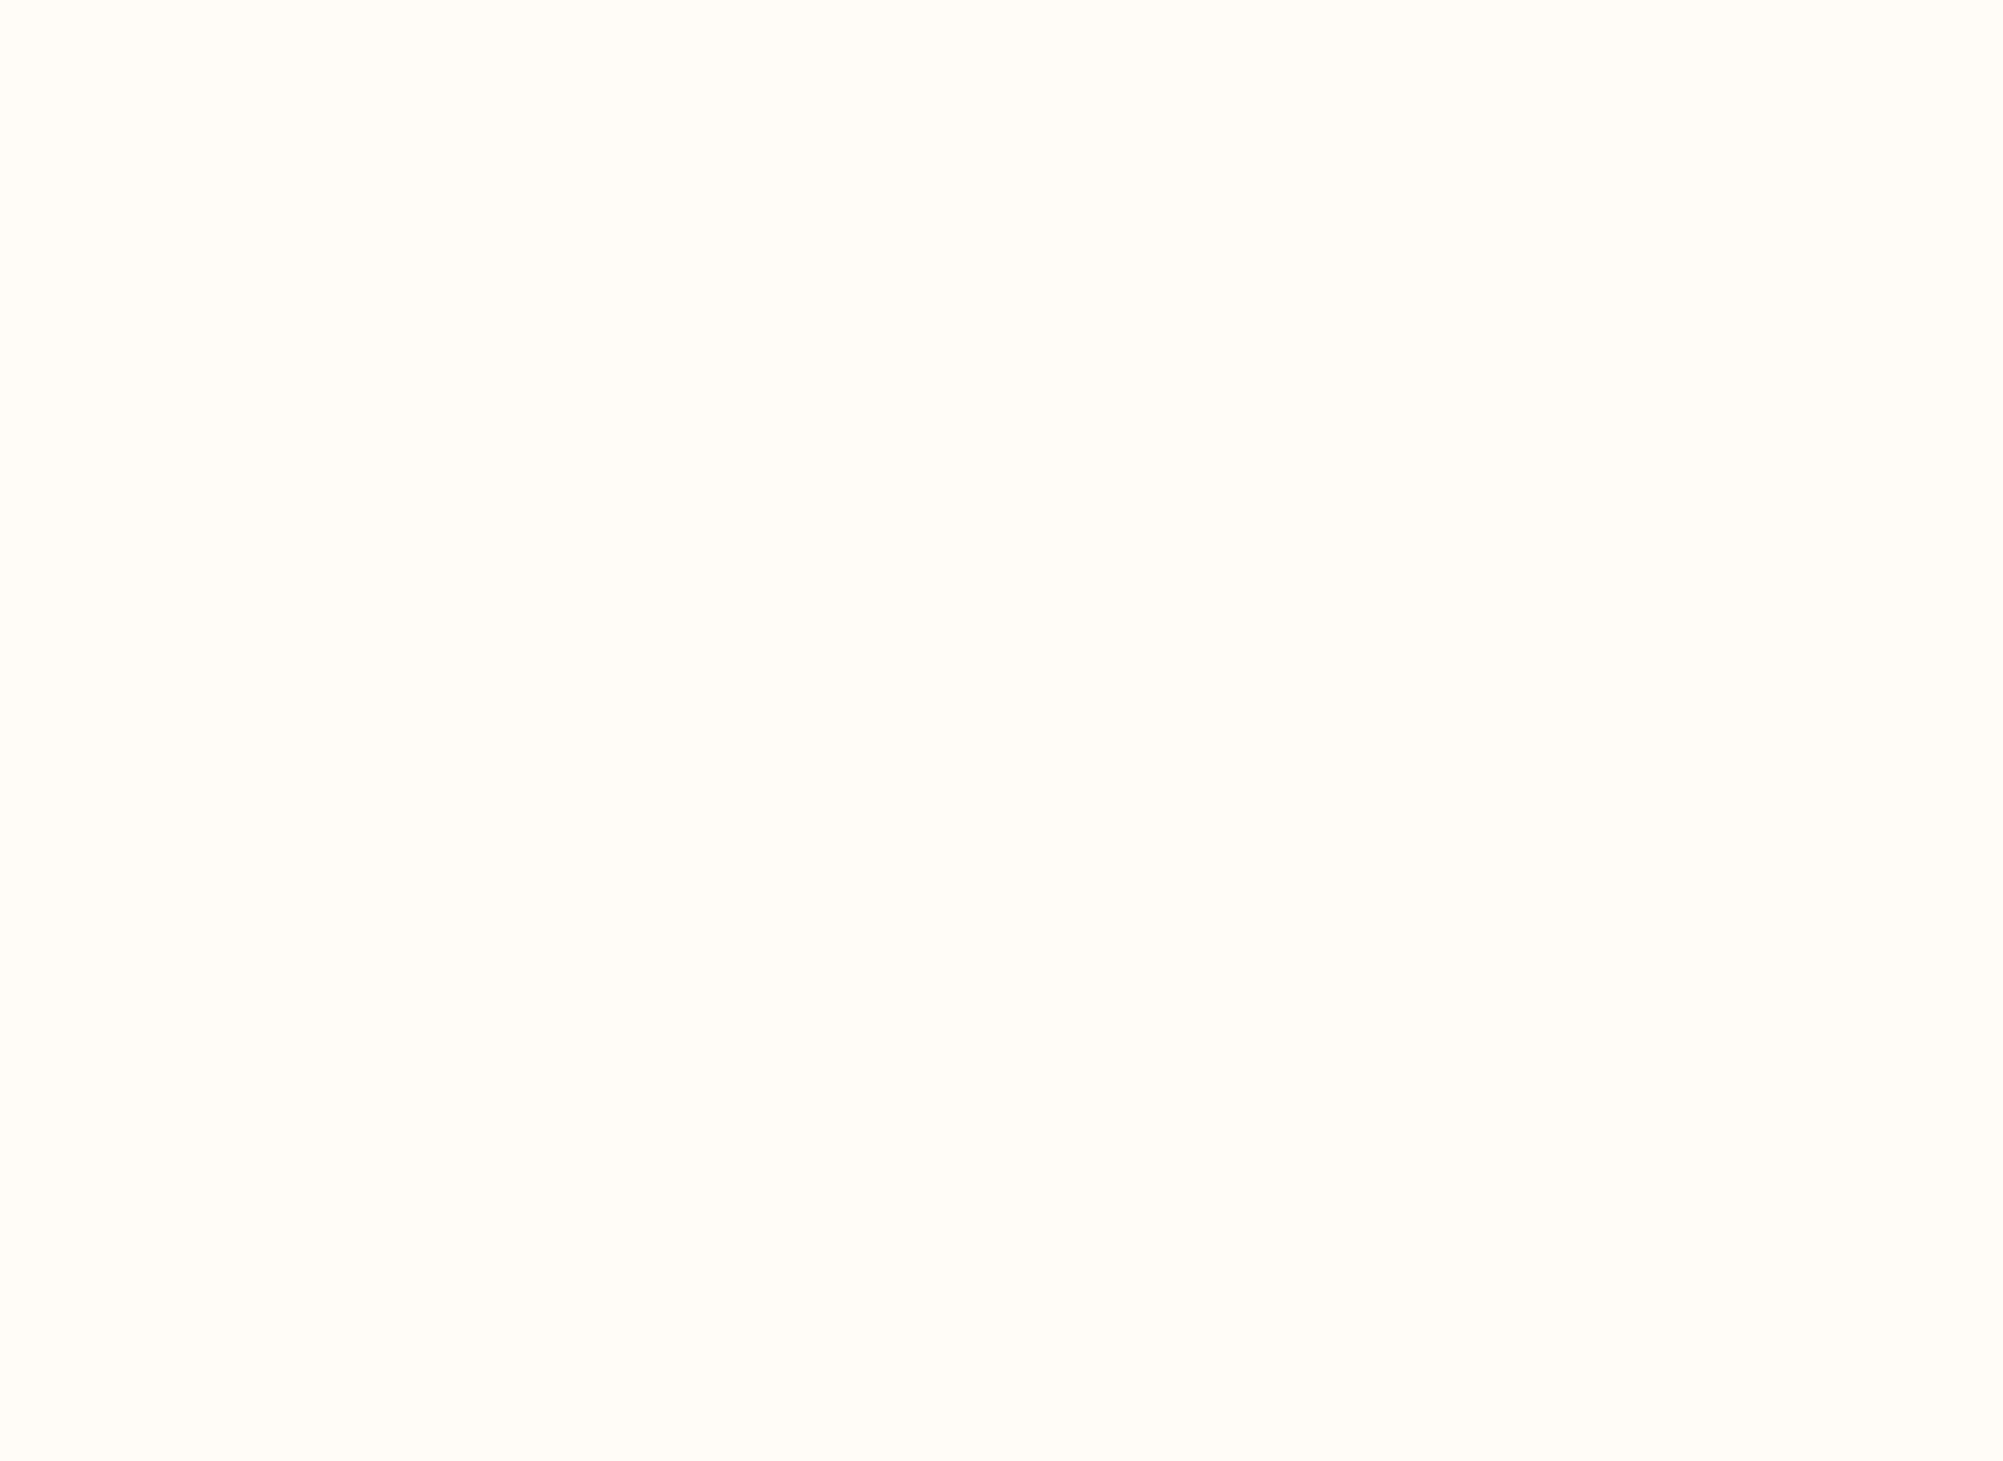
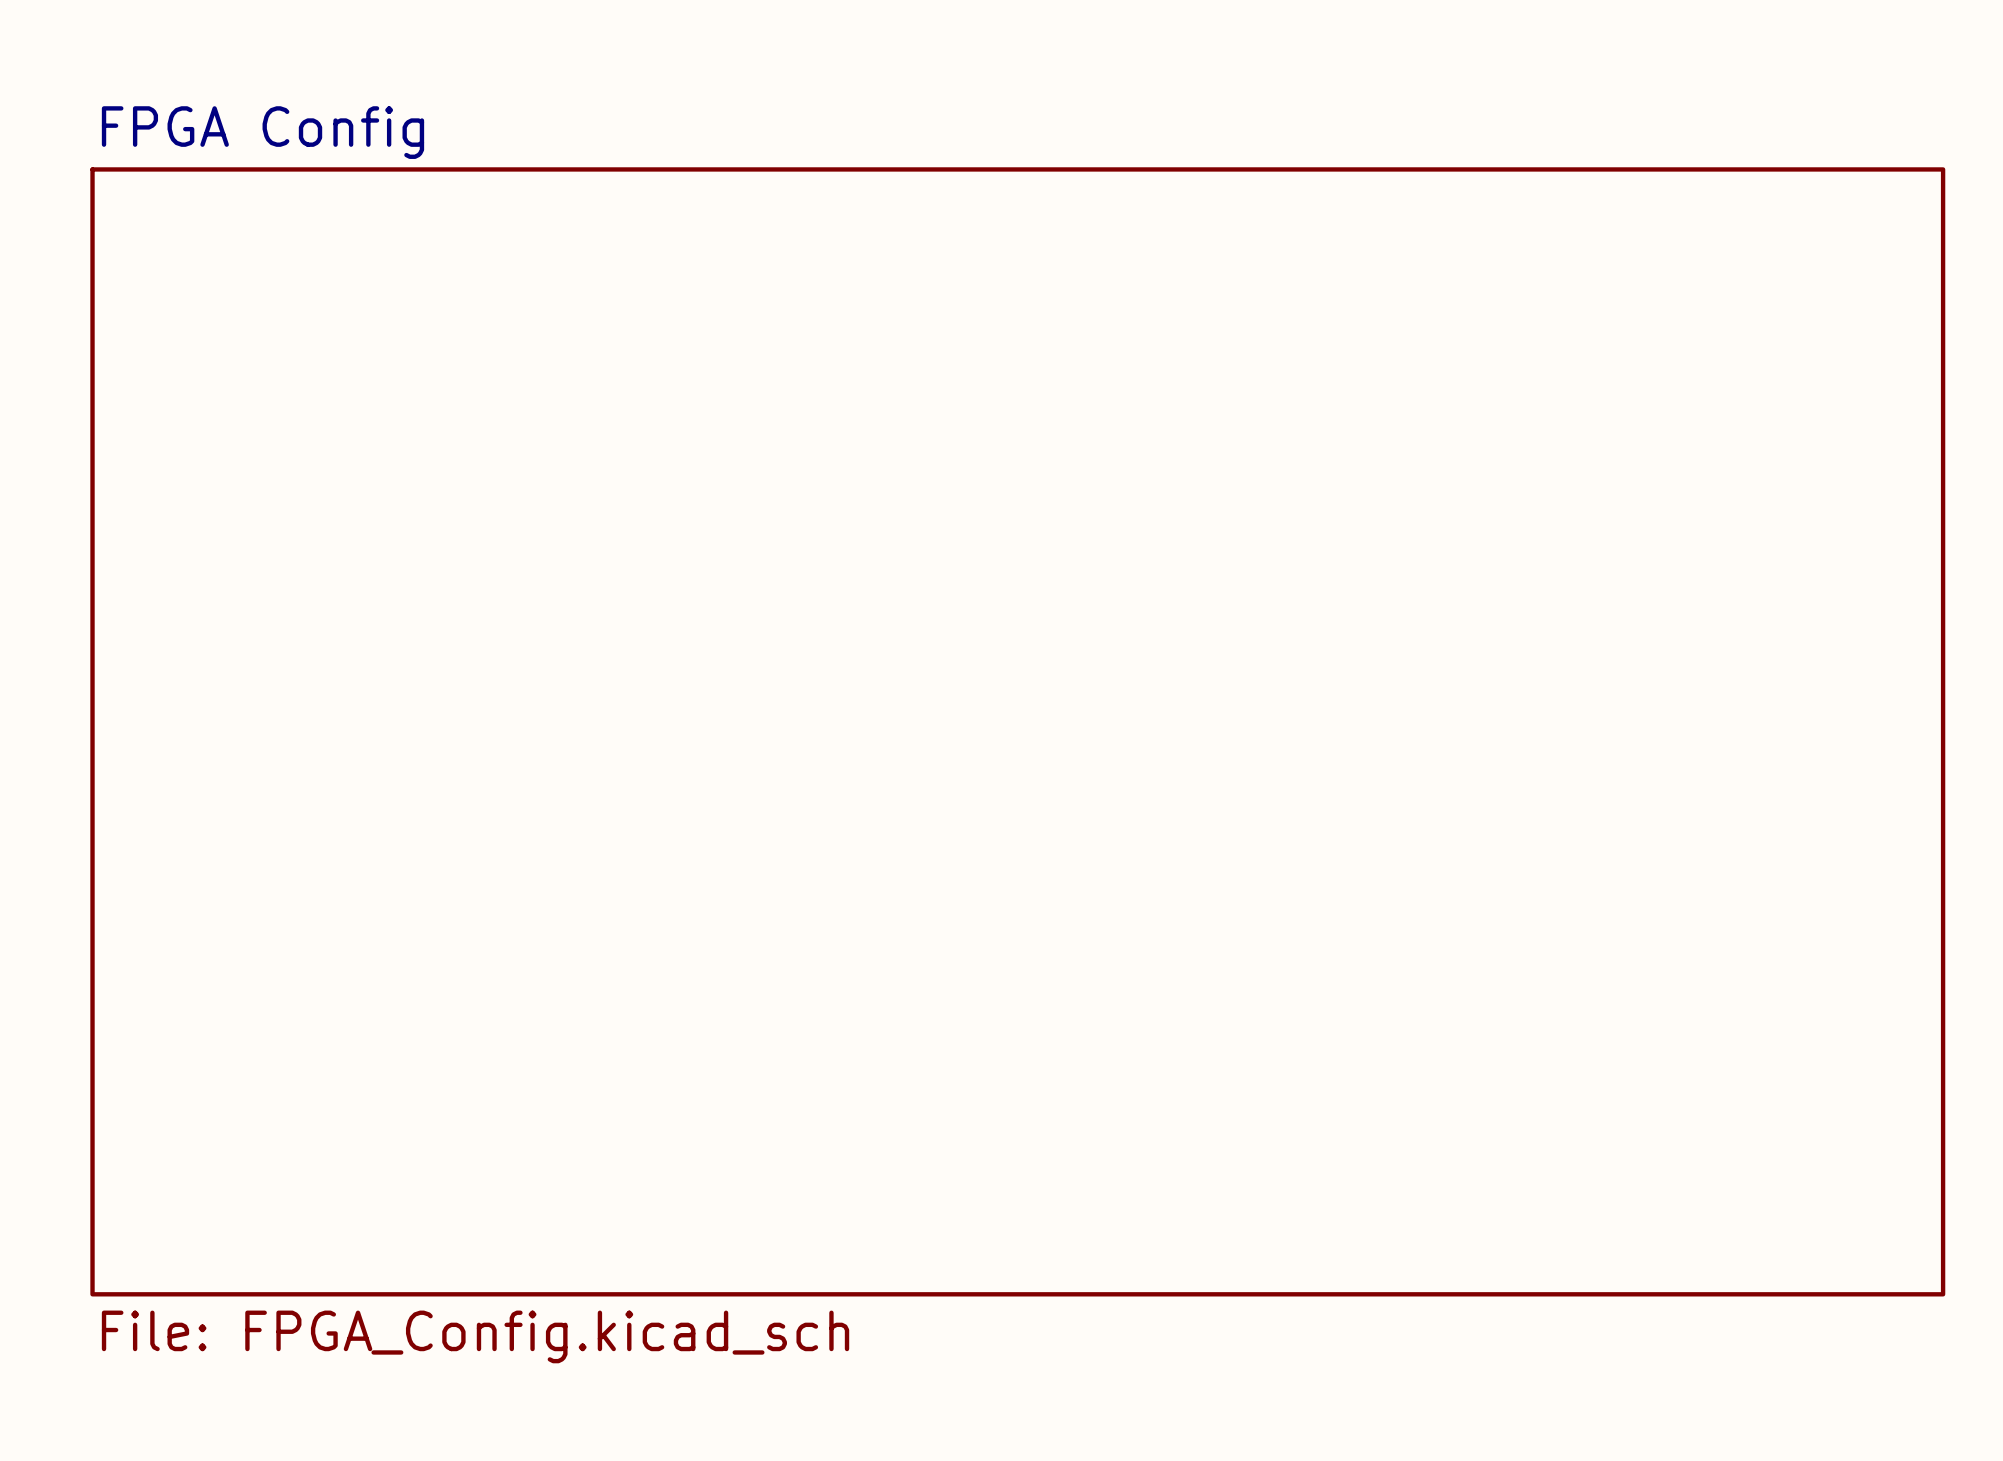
sheet FPGA Config: none -> File: FPGA_Config.kicad_sch (1017, 731)

